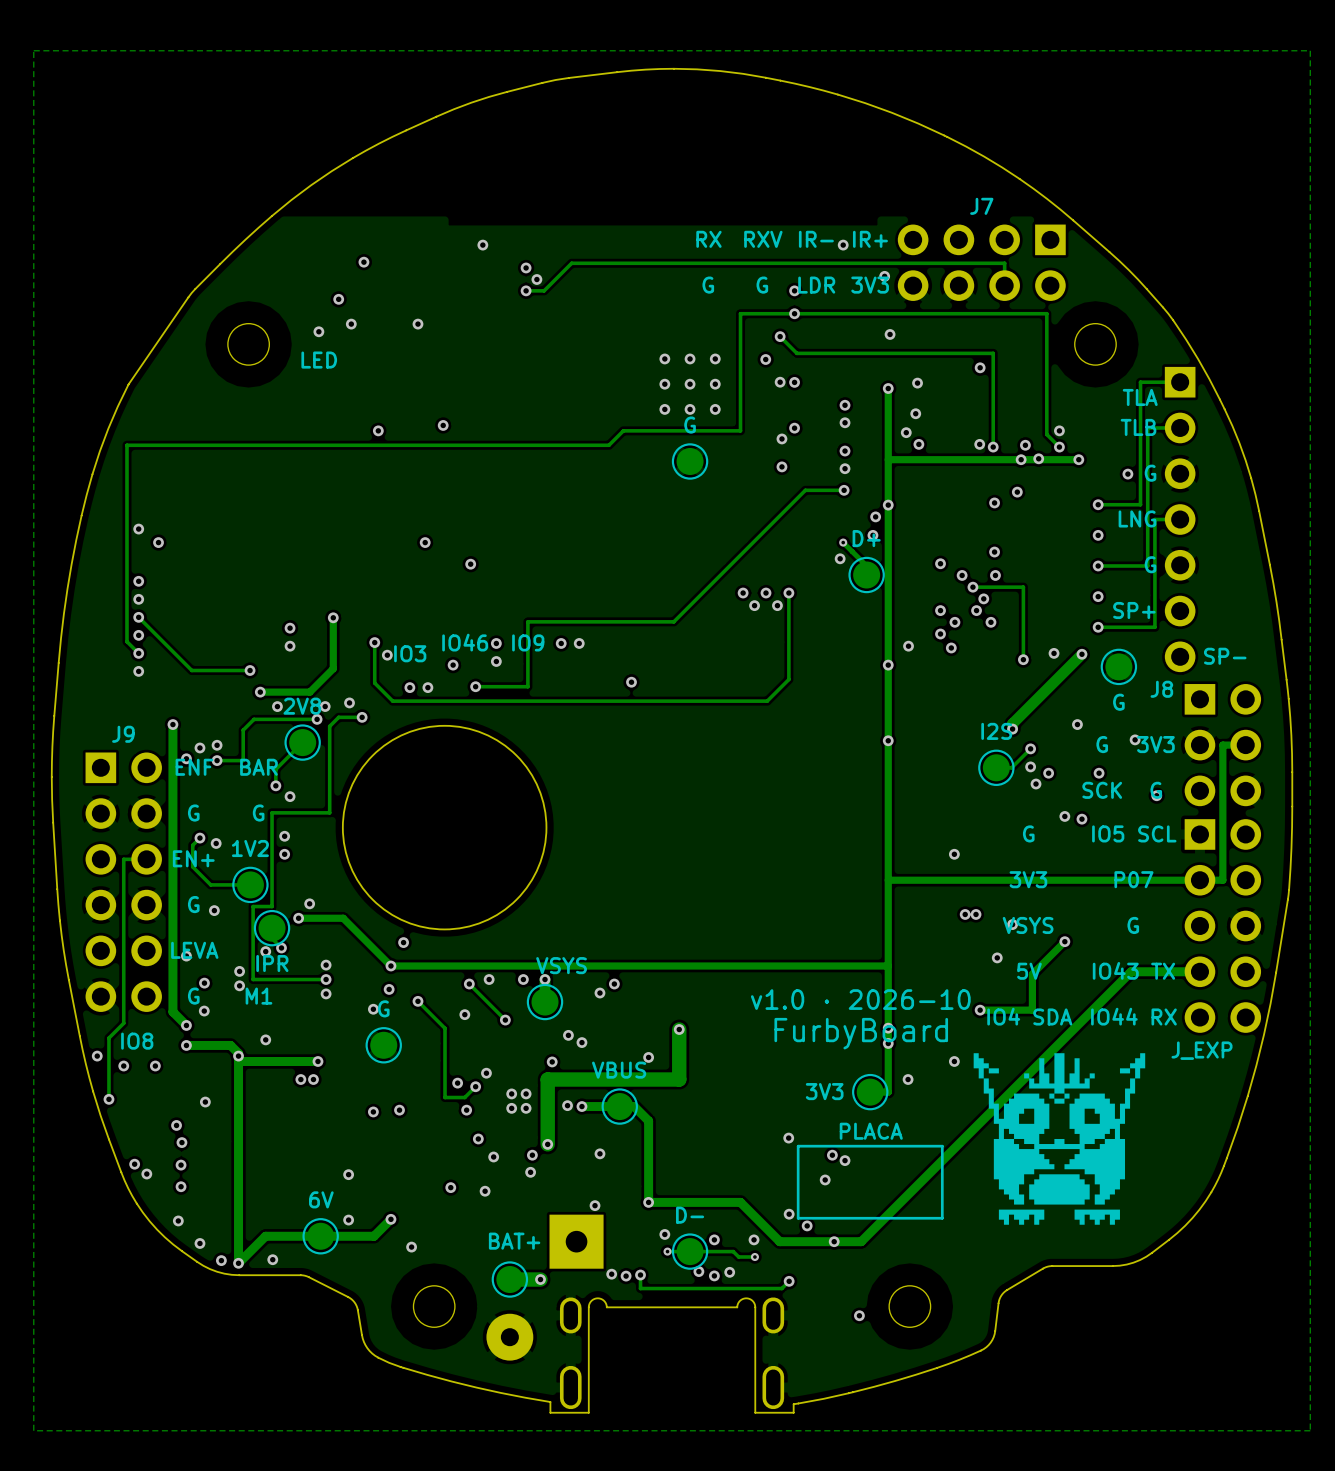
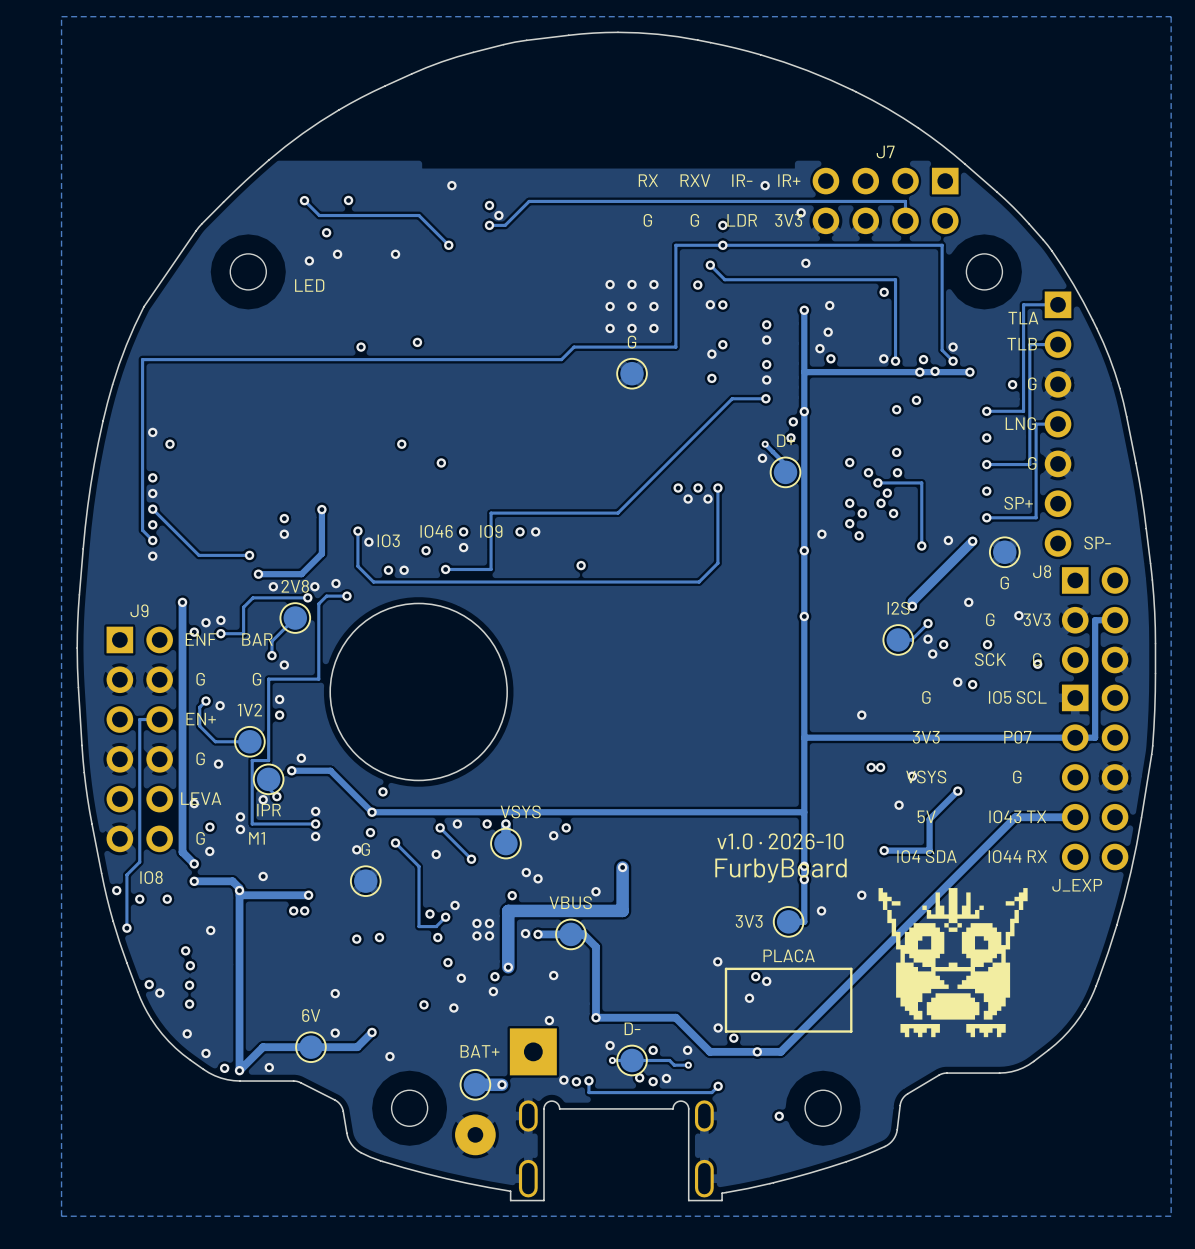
track: none -> (304, 200) (319, 215) (419, 215) (448, 245)
via: none -> (304, 200)
via: none -> (448, 245)

